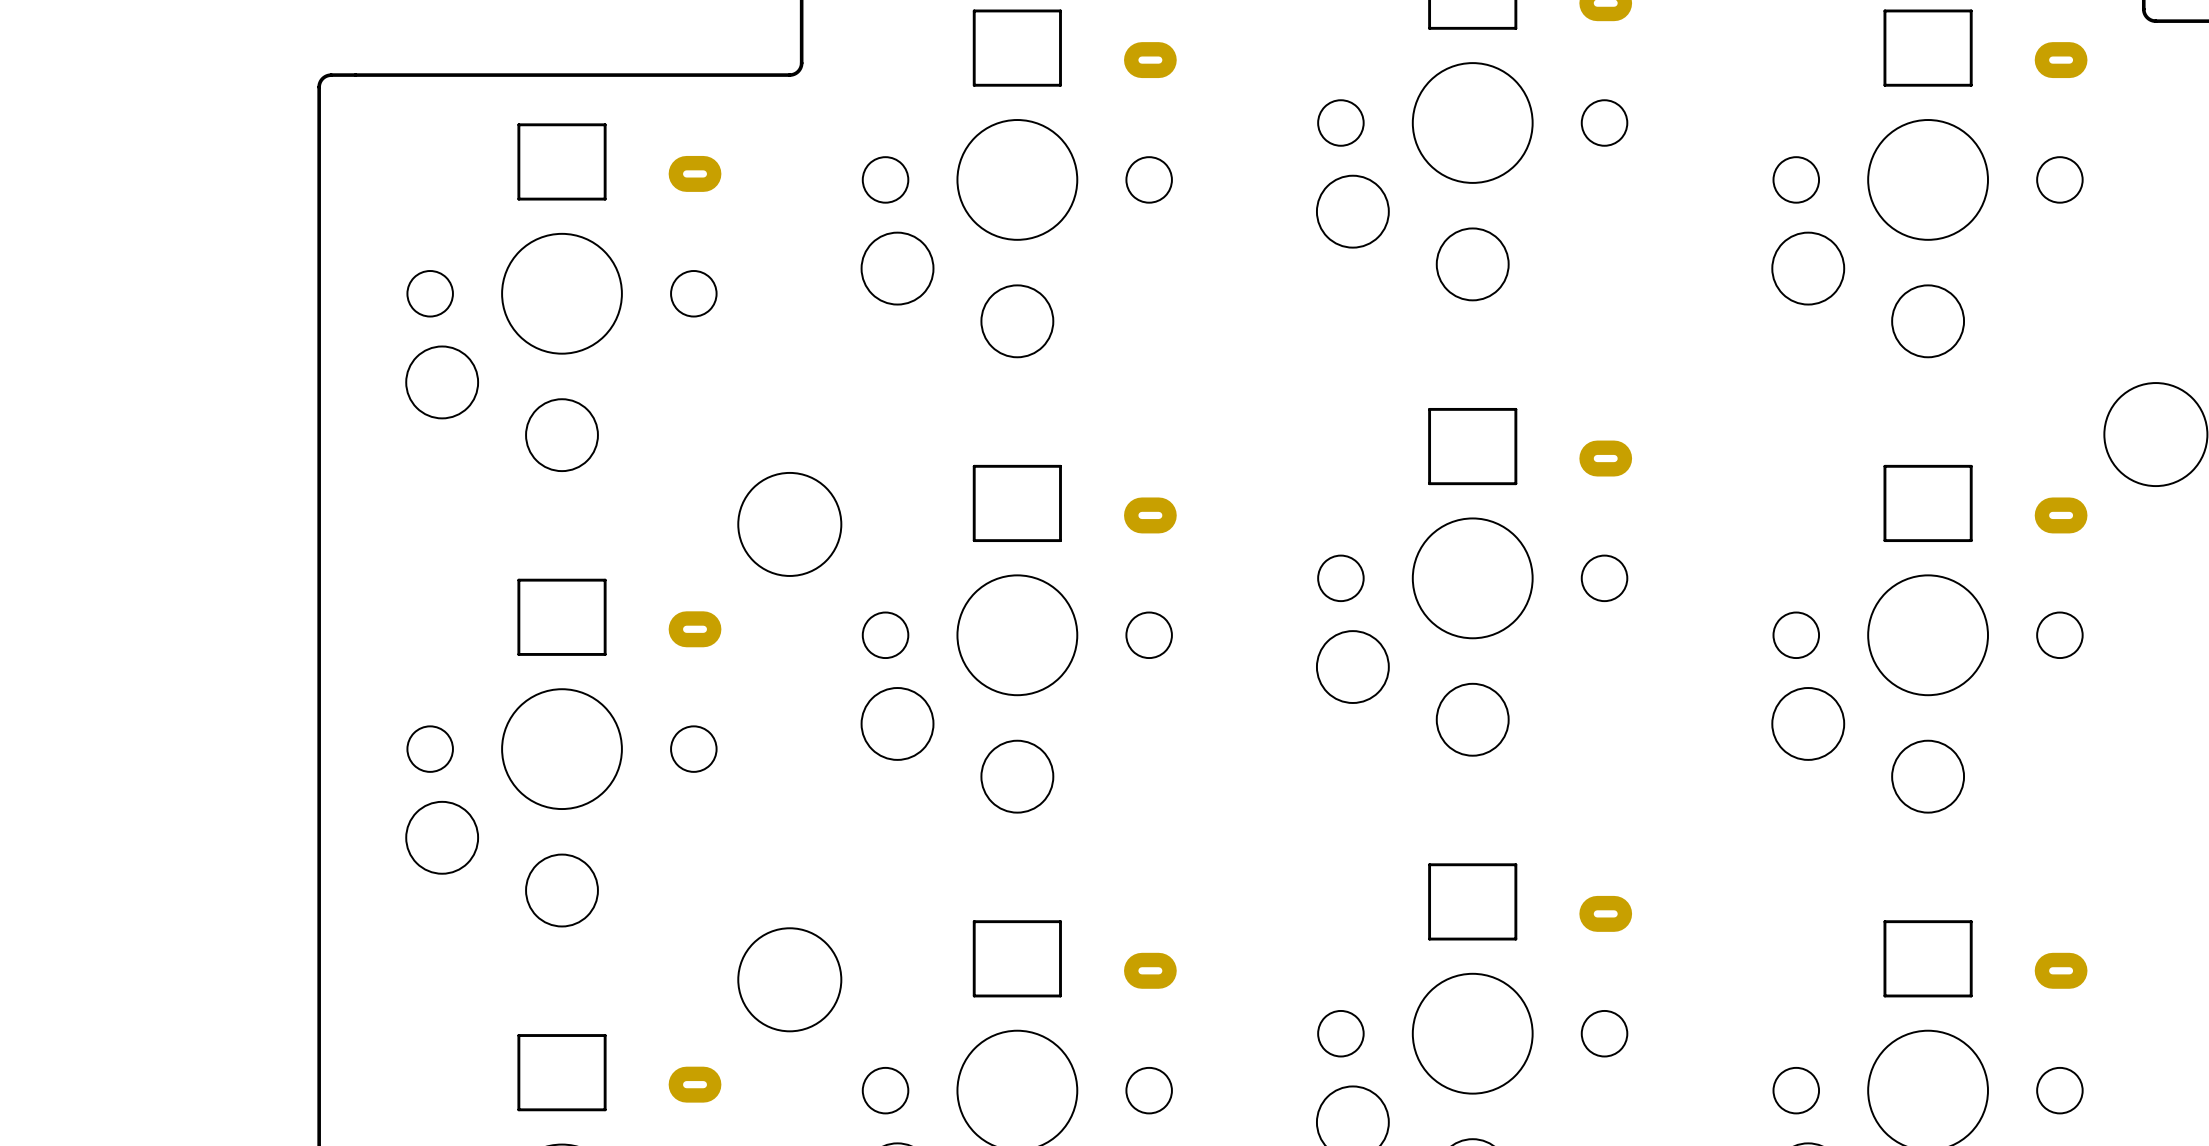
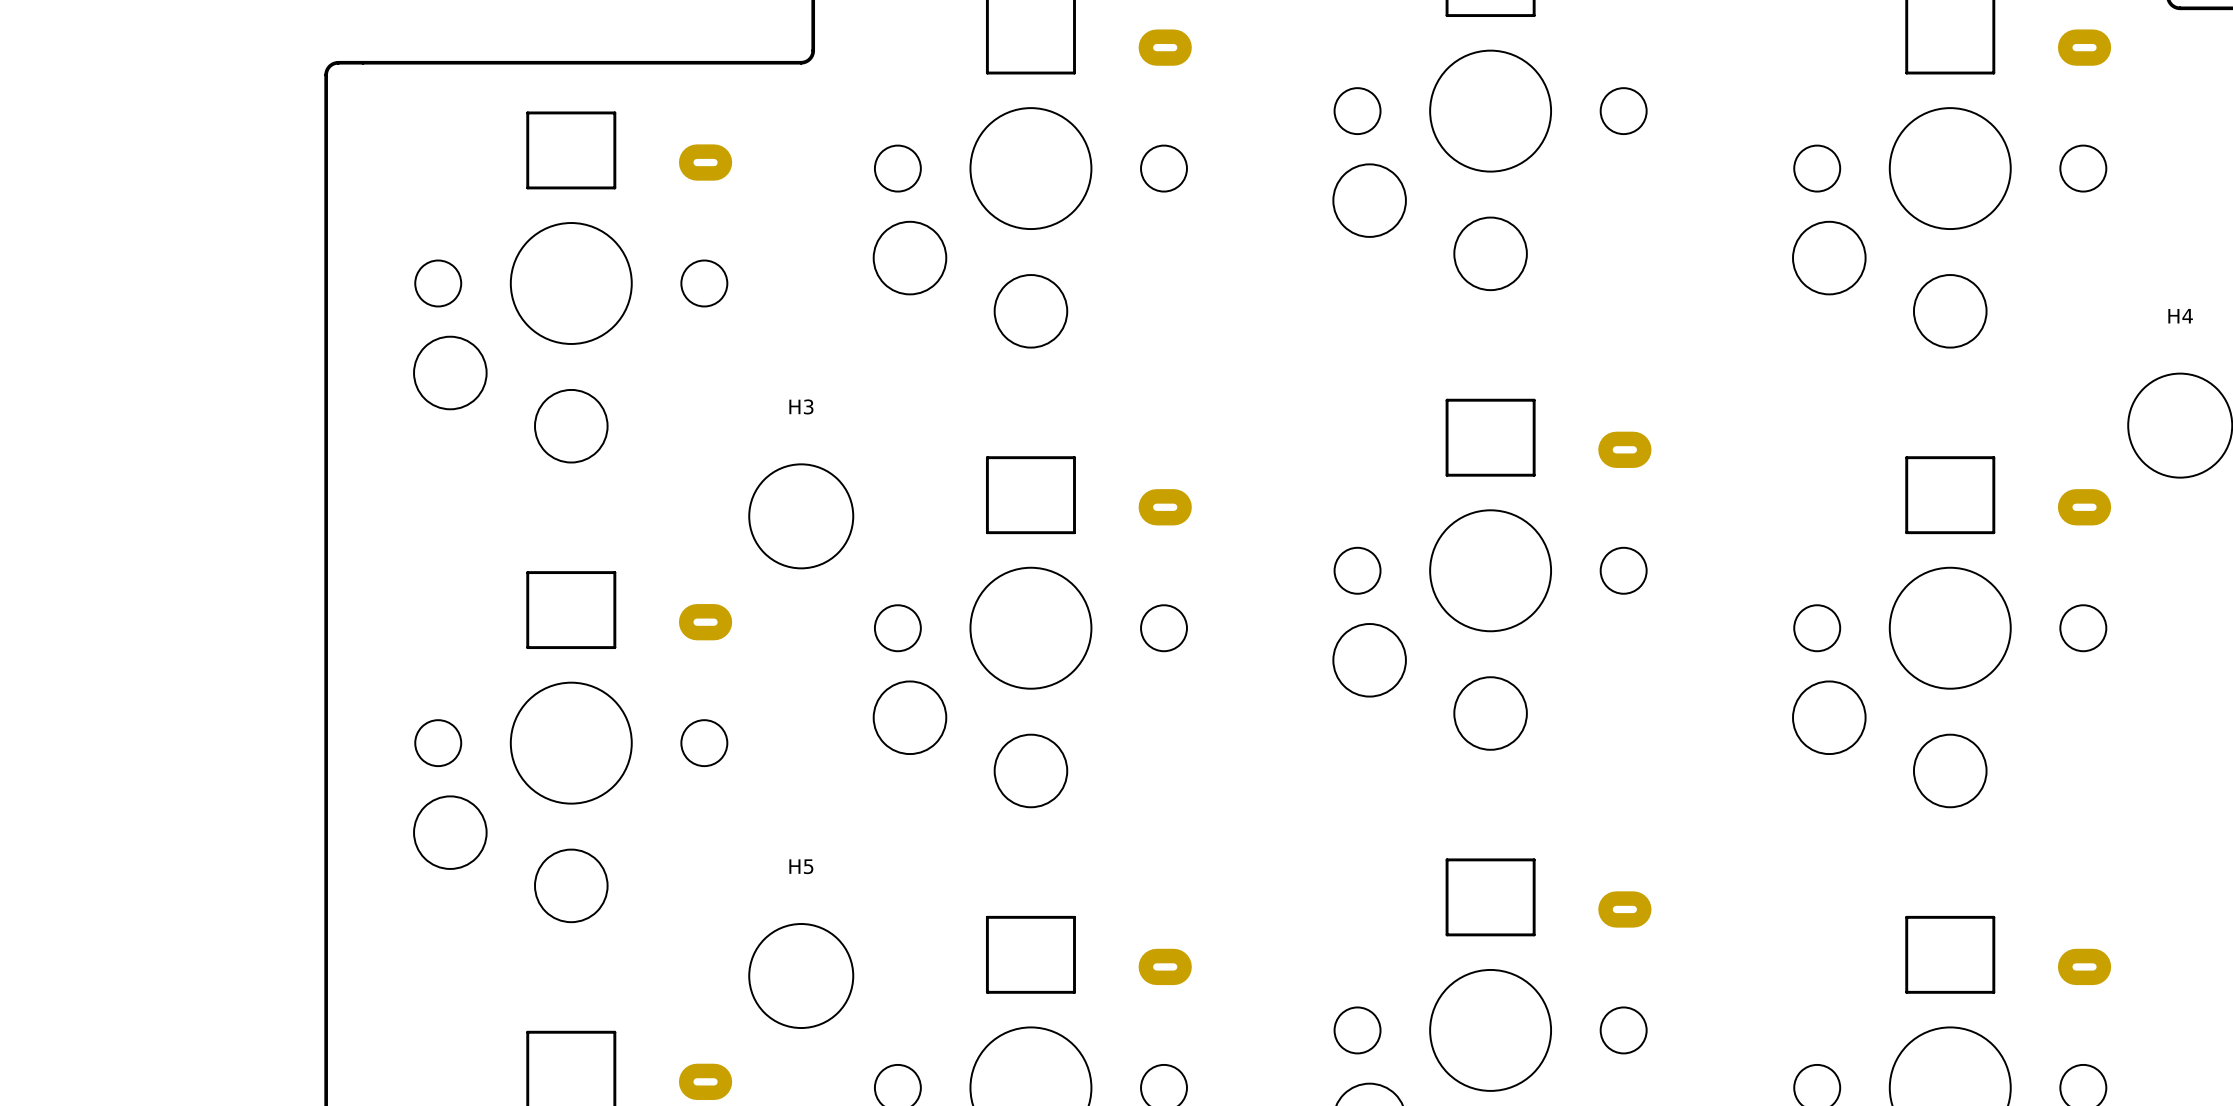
H4 name: none -> H4 (2180, 316)
H3 name: none -> H3 (801, 406)
H5 name: none -> H5 (801, 866)

